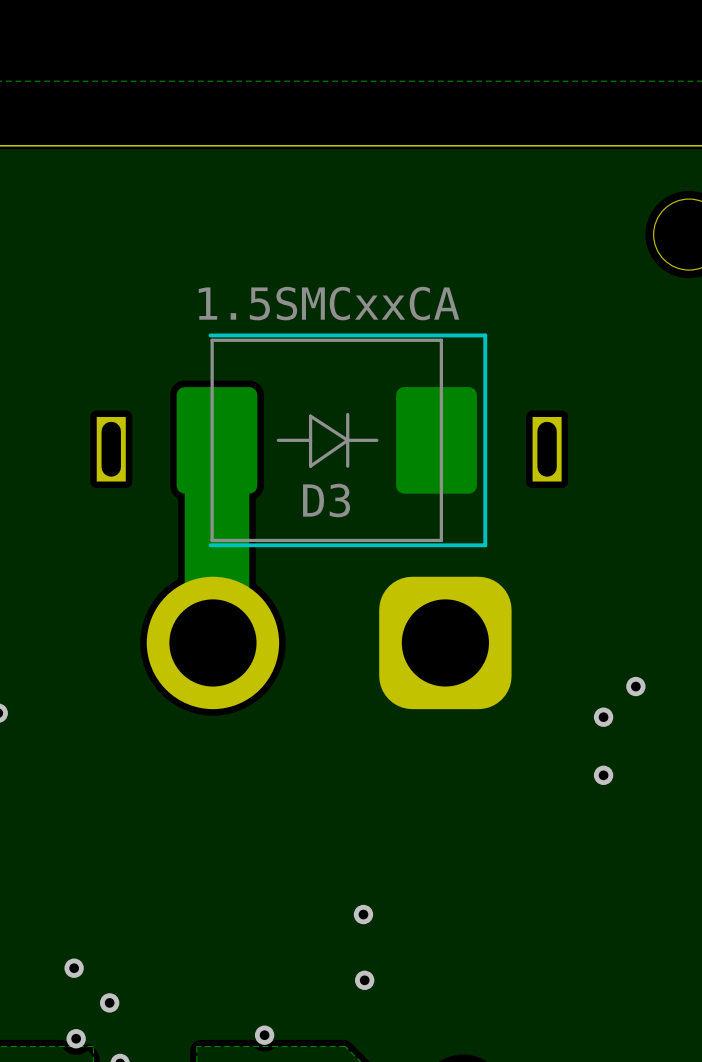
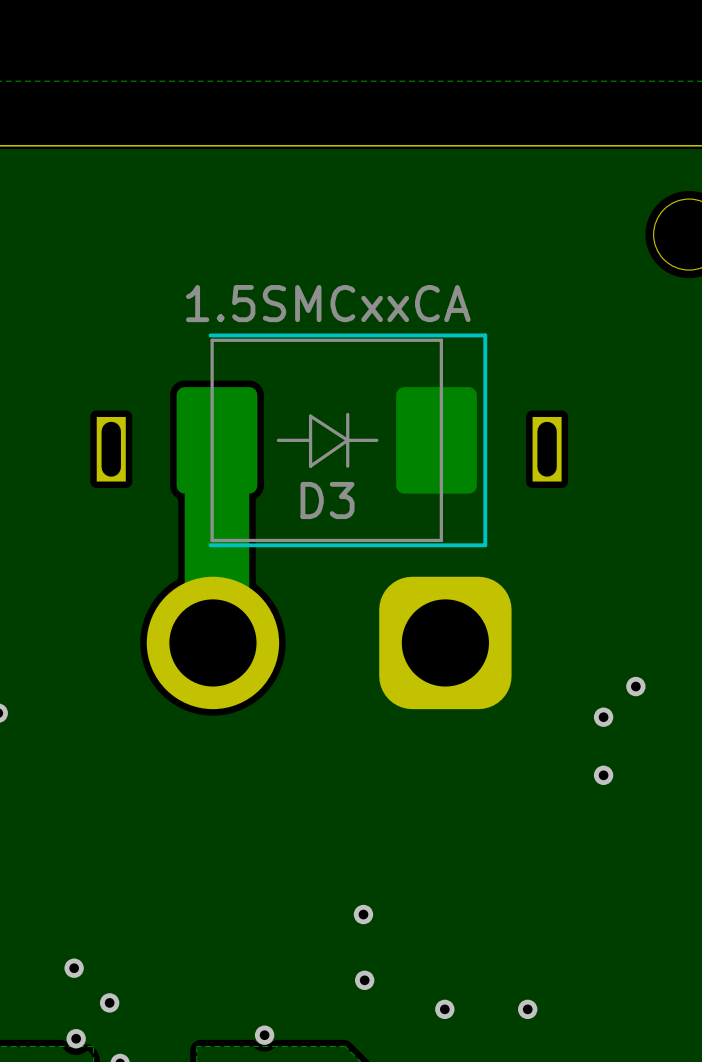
via: none -> (444, 1009)
via: none -> (527, 1009)

